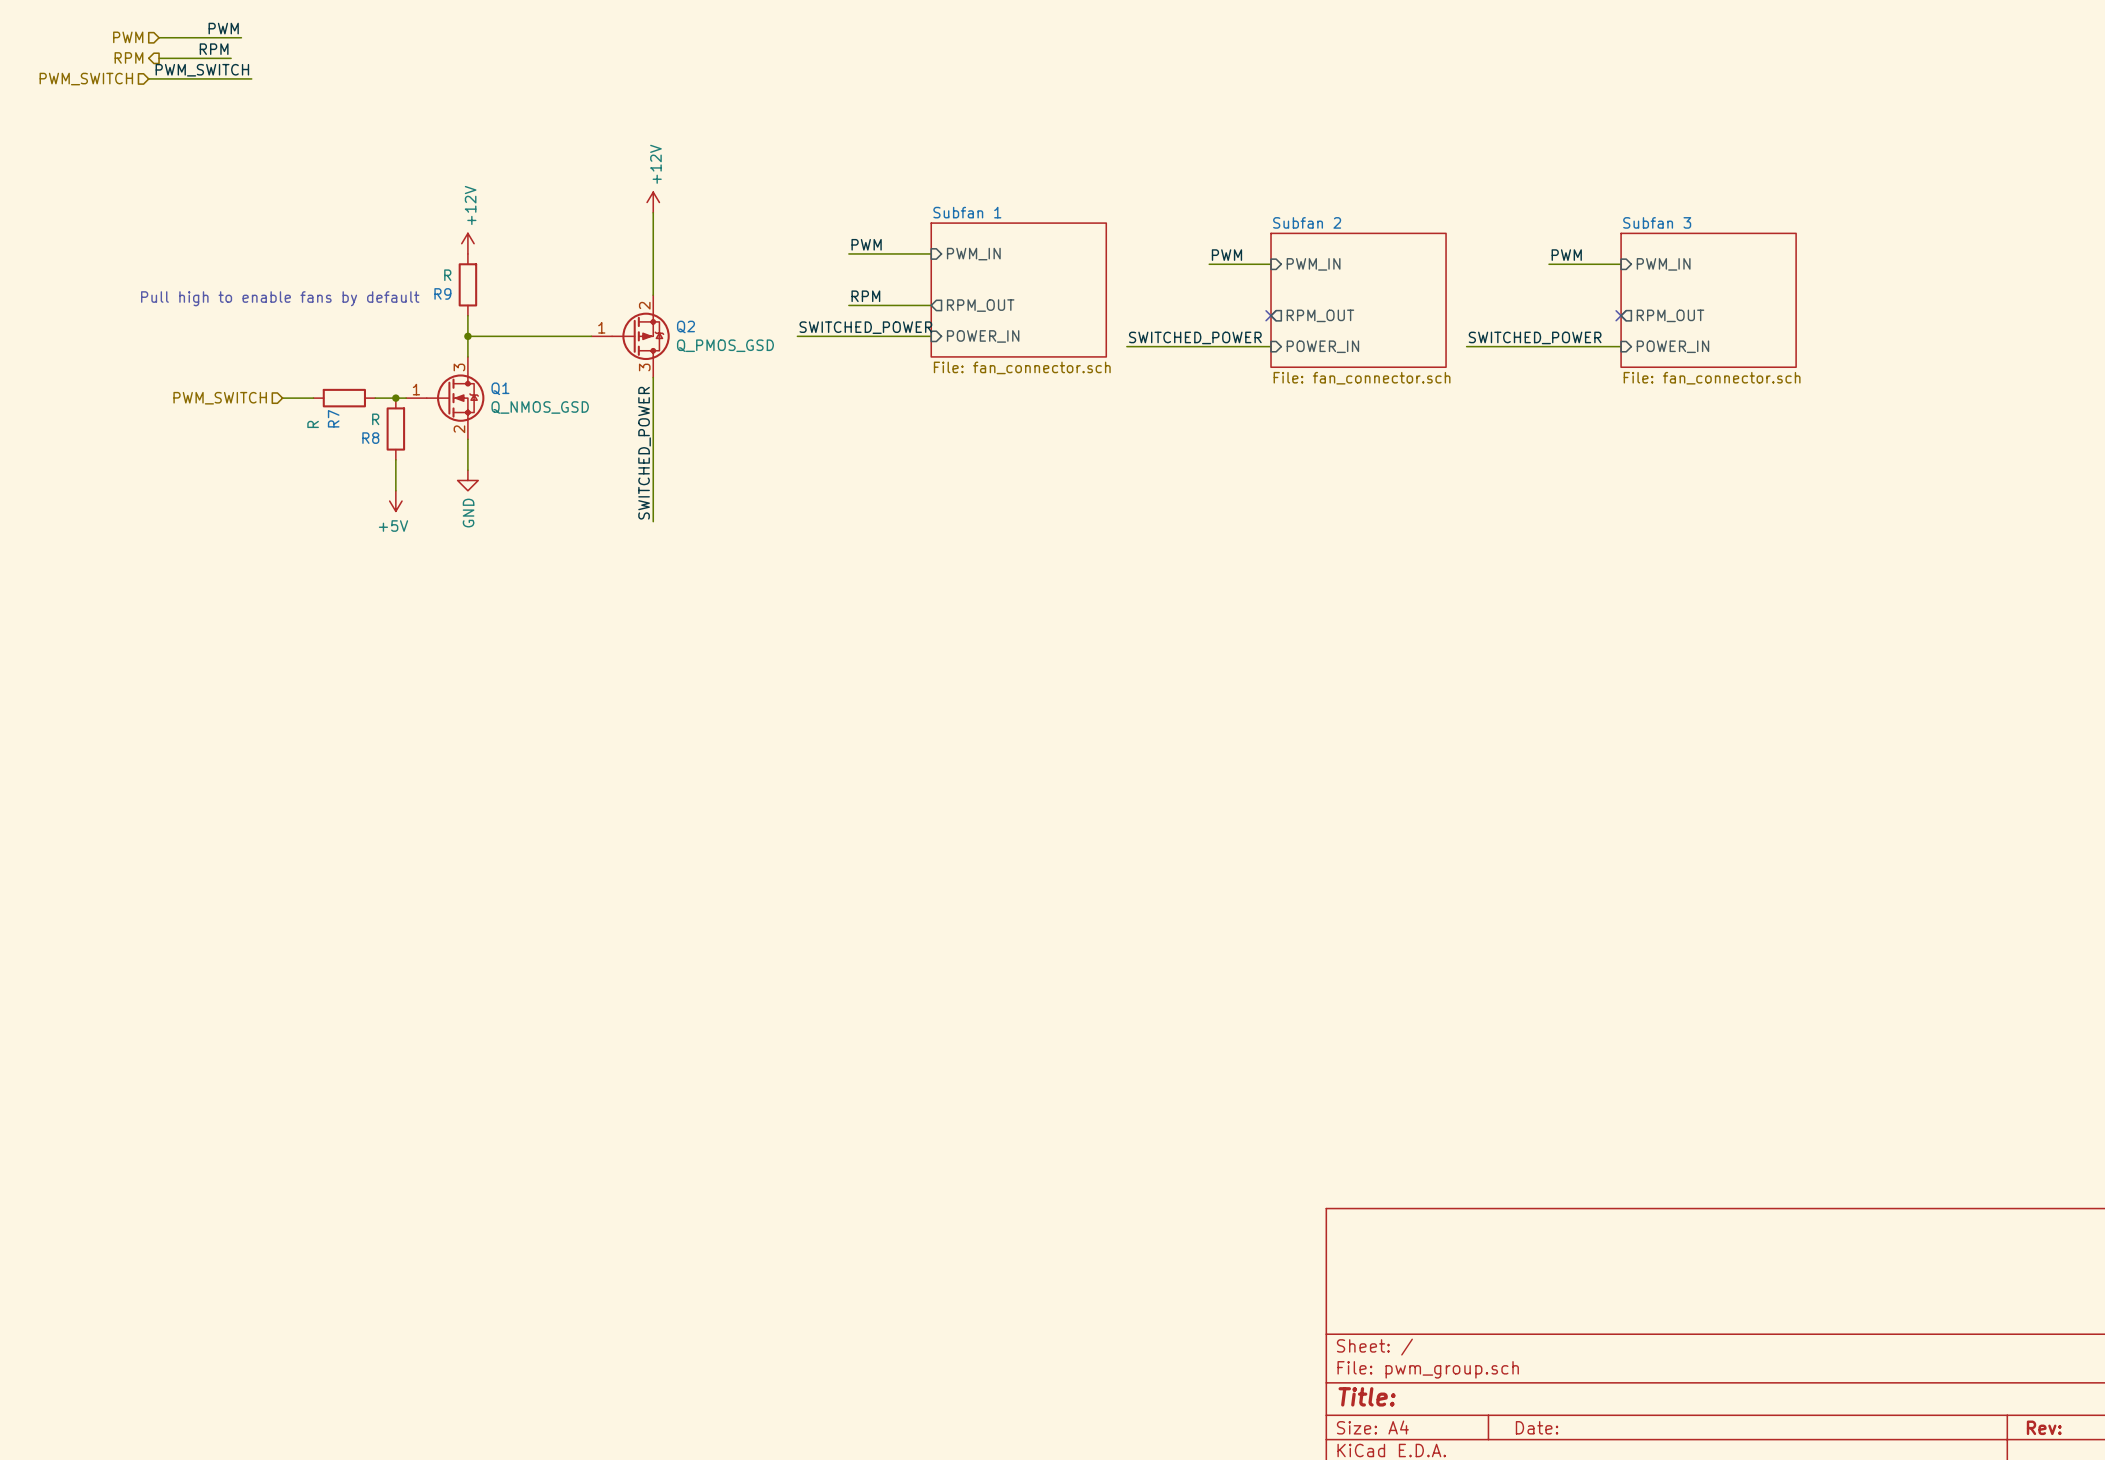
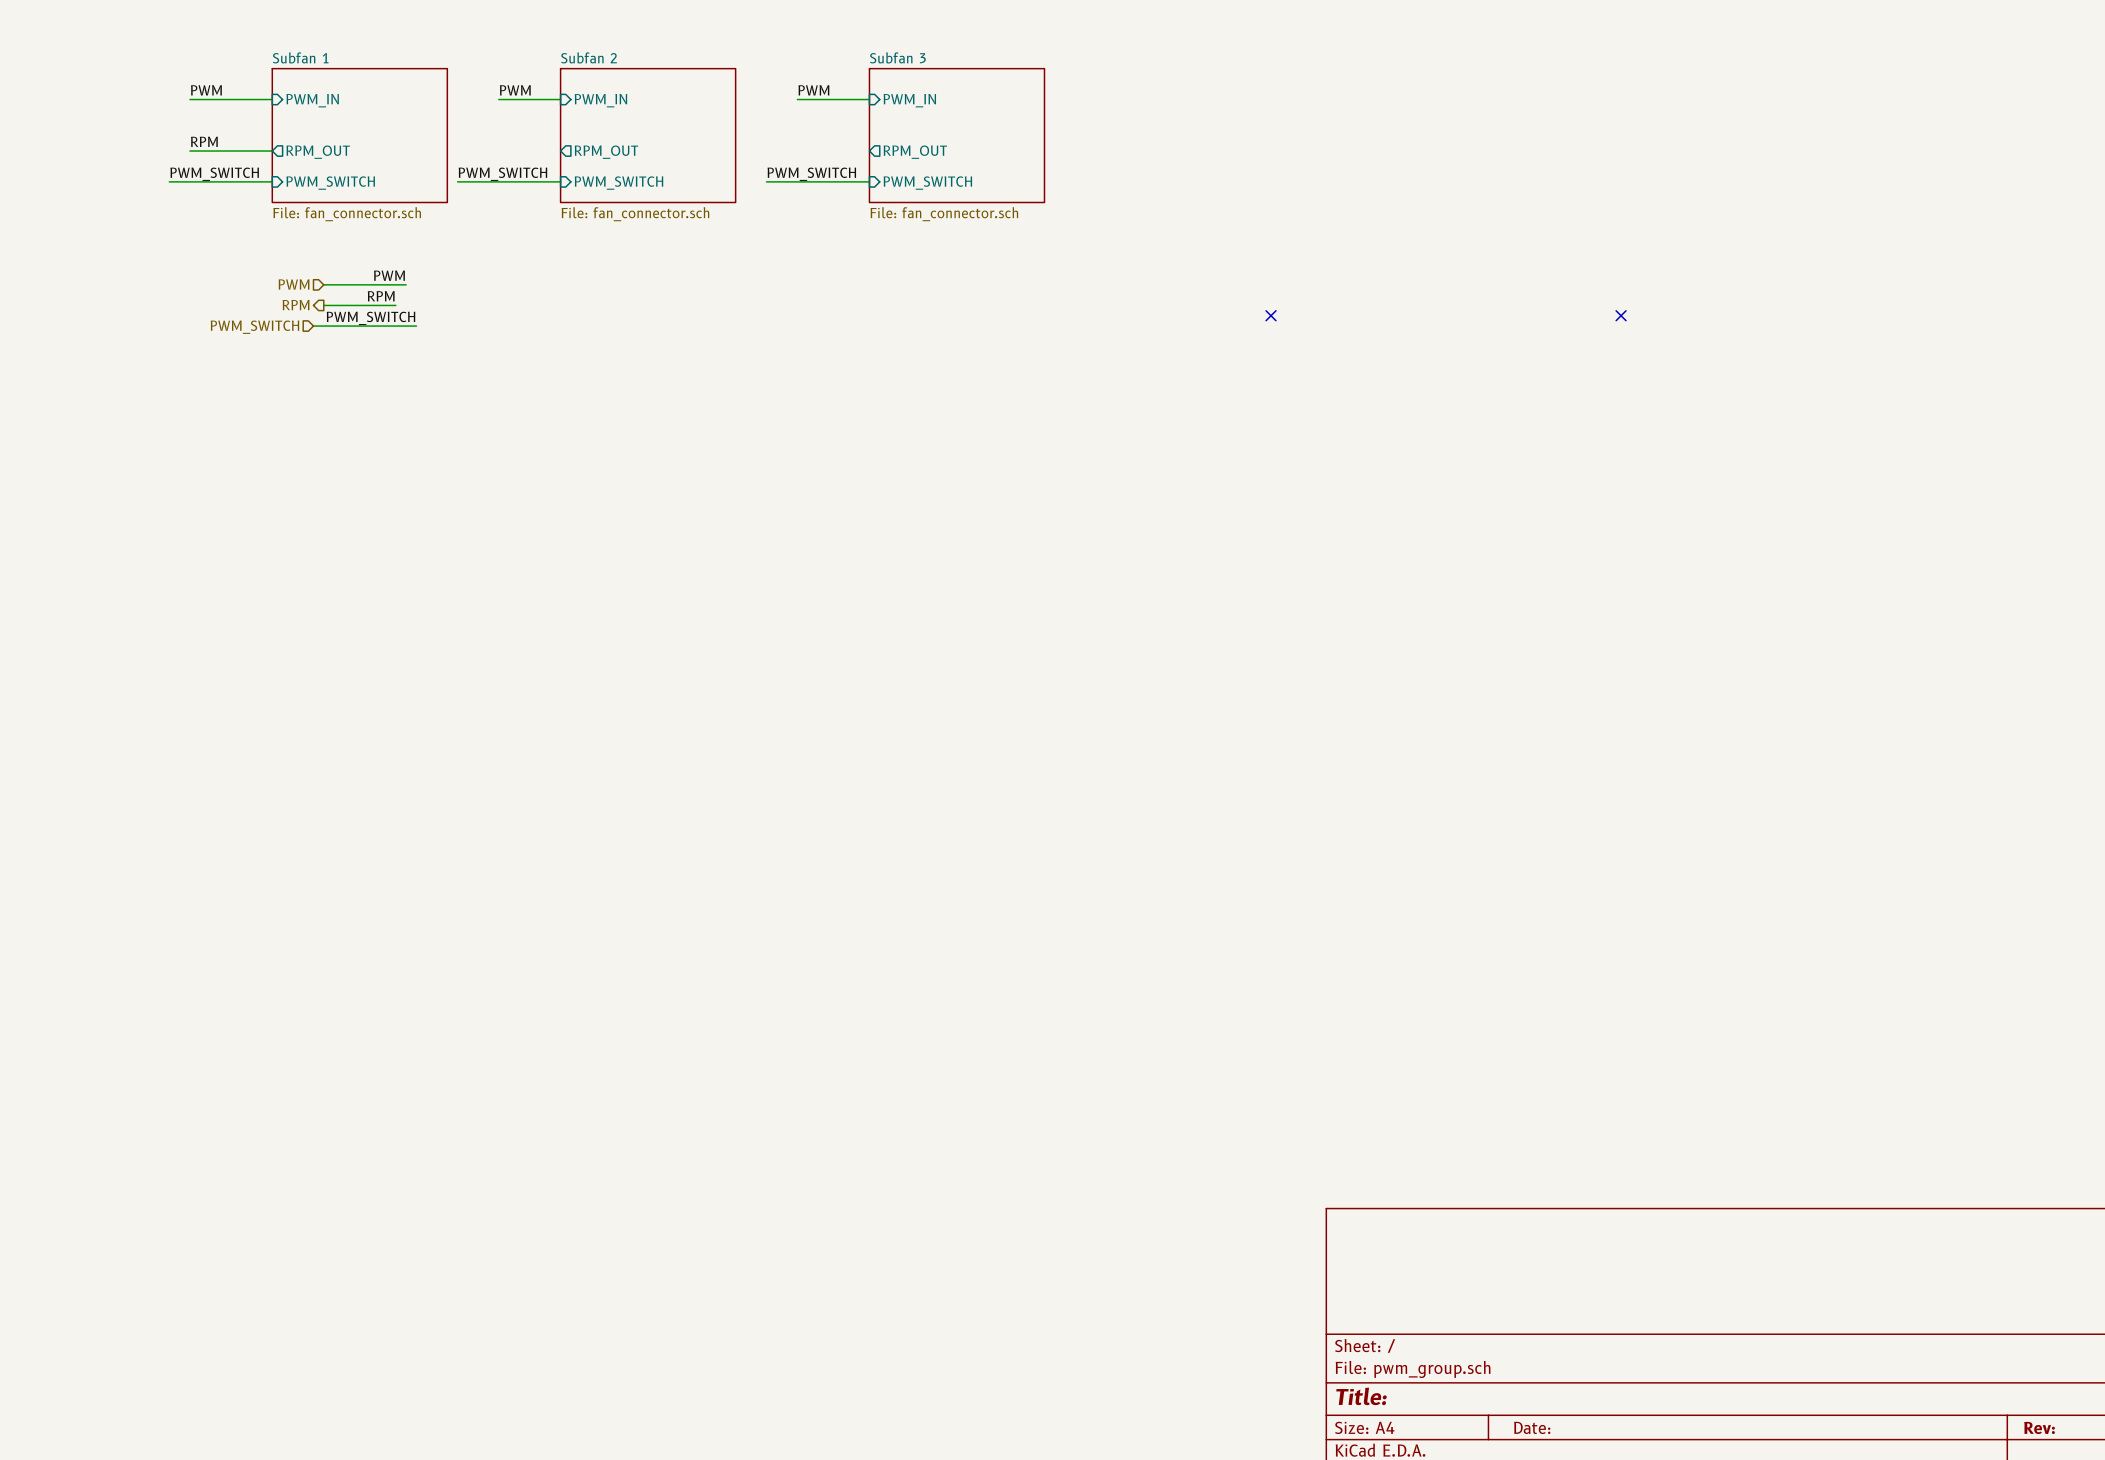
label position: PWM (223, 28) -> PWM (206, 90)
hierarchical label: PWM (128, 37) -> none
wire: (159, 37) (241, 37) -> (189, 99) (272, 99)
label position: RPM (214, 49) -> RPM (204, 141)
hierarchical label: RPM (128, 57) -> none
wire: (159, 58) (231, 58) -> none
label: PWM_SWITCH (202, 70) -> none
wire: (148, 78) (251, 78) -> (169, 181) (272, 181)
hierarchical label: PWM_SWITCH (86, 79) -> none
label: none -> PWM (515, 90)
sheet pin: none -> PWM_IN (312, 100)
wire: none -> (498, 99) (560, 99)
sheet pin: none -> PWM_IN (600, 100)
wire: none -> (797, 99) (869, 99)
wire: none -> (189, 151) (272, 151)
sheet pin: none -> RPM_OUT (318, 152)
sheet pin: none -> RPM_OUT (606, 152)
label: none -> PWM_SWITCH (214, 174)
label: none -> PWM_SWITCH (502, 174)
label: none -> PWM_SWITCH (811, 174)
wire: none -> (457, 181) (560, 181)
wire: none -> (766, 181) (869, 181)
sheet pin: none -> PWM_SWITCH (330, 183)
sheet pin: none -> PWM_SWITCH (618, 183)
sheet pin: none -> PWM_SWITCH (927, 183)
power symbol: +12V (653, 202) -> none
wire: (653, 212) (653, 295) -> none
power symbol: +12V (467, 243) -> none
label position: PWM (866, 244) -> PWM (813, 90)
wire: (848, 253) (931, 253) -> none
sheet pin position: PWM_IN (973, 254) -> PWM_IN (909, 100)
label: PWM (1226, 255) -> none
label: PWM (1566, 255) -> none
wire: (1209, 264) (1271, 264) -> none
sheet pin: PWM_IN (1313, 264) -> none
wire: (1549, 264) (1621, 264) -> none
sheet pin: PWM_IN (1663, 264) -> none
label: none -> PWM (389, 275)
hierarchical label: none -> PWM (293, 284)
wire: none -> (323, 284) (406, 284)
R9: R (467, 284) -> none
sheet Subfan 1 position: (1018, 290) -> (359, 135)
label: none -> RPM (381, 296)
label: RPM (865, 296) -> none
text: Pull high to enable fans by default (280, 298) -> none
sheet Subfan 2 position: (1358, 300) -> (648, 135)
sheet Subfan 3 position: (1708, 300) -> (956, 135)
hierarchical label: none -> RPM (296, 305)
wire: none -> (323, 305) (395, 305)
wire: (848, 305) (931, 305) -> none
sheet pin position: RPM_OUT (980, 305) -> RPM_OUT (915, 152)
wire: (467, 315) (467, 356) -> none
sheet pin: RPM_OUT (1320, 315) -> none
sheet pin: RPM_OUT (1670, 315) -> none
label: none -> PWM_SWITCH (370, 318)
wire: none -> (313, 326) (416, 326)
label: SWITCHED_POWER (865, 327) -> none
wire: (467, 336) (591, 336) -> none
junction: (467, 336) -> none
Q2: Q_PMOS_GSD (630, 336) -> none
wire: (797, 336) (931, 336) -> none
sheet pin: POWER_IN (983, 336) -> none
label: SWITCHED_POWER (1195, 337) -> none
label: SWITCHED_POWER (1535, 337) -> none
wire: (1126, 346) (1271, 346) -> none
sheet pin: POWER_IN (1322, 346) -> none
wire: (1466, 346) (1621, 346) -> none
sheet pin: POWER_IN (1672, 346) -> none
wire: (653, 377) (653, 521) -> none
hierarchical label position: PWM_SWITCH (220, 398) -> PWM_SWITCH (254, 327)
wire: (282, 398) (313, 398) -> none
R7: R (344, 398) -> none
wire: (375, 398) (406, 398) -> none
junction: (395, 398) -> none
Q1: Q_NMOS_GSD (445, 398) -> none
R8: R (395, 429) -> none
wire: (467, 439) (467, 470) -> none
label: SWITCHED_POWER (644, 453) -> none
wire: (395, 459) (395, 490) -> none
power symbol: GND (467, 480) -> none
power symbol: +5V (395, 501) -> none

